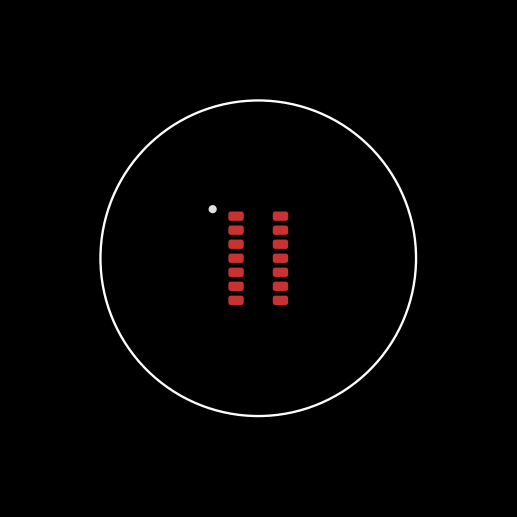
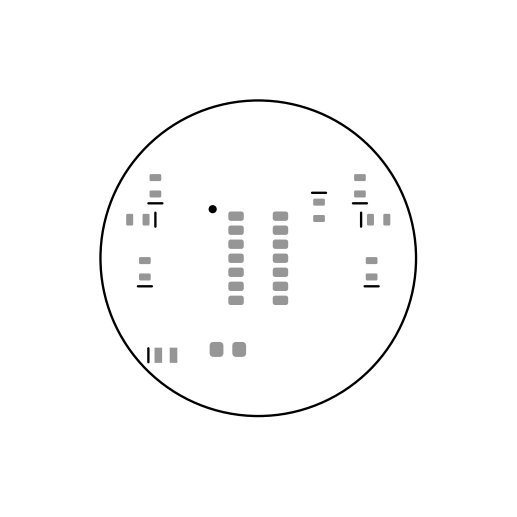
part: none -> (155, 189)
part: none -> (359, 189)
part: none -> (319, 206)
part: none -> (141, 219)
part: none -> (375, 219)
part: none -> (144, 272)
part: none -> (371, 272)
part: none -> (227, 349)
part: none -> (162, 355)

